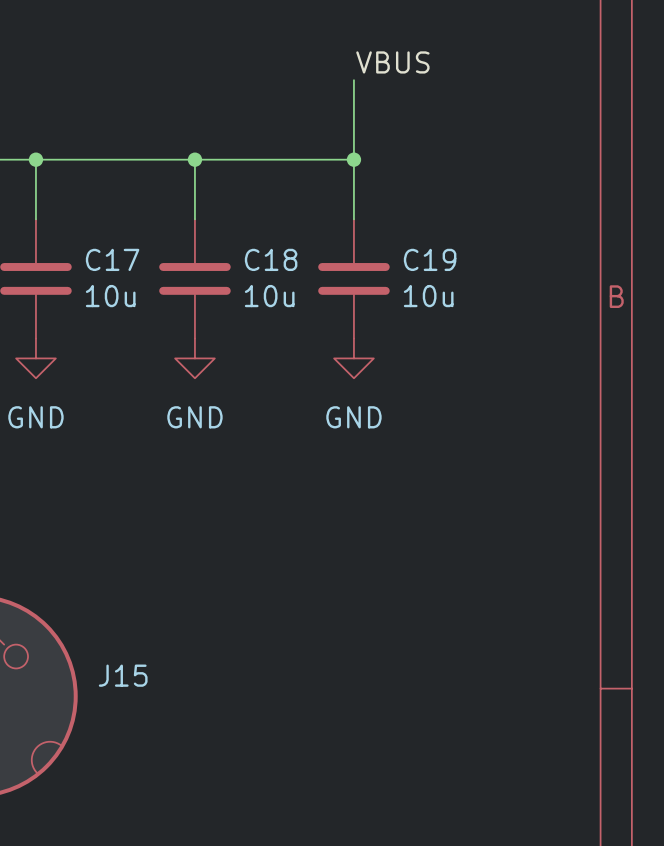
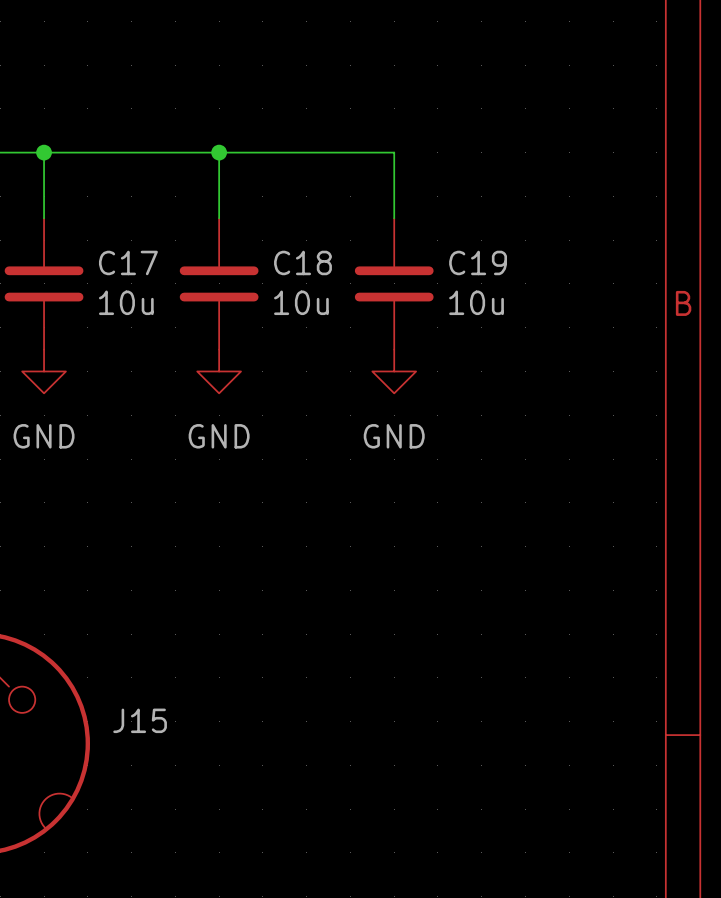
label: VBUS (392, 62) -> none
wire: (353, 80) (353, 159) -> none
junction: (353, 159) -> none

